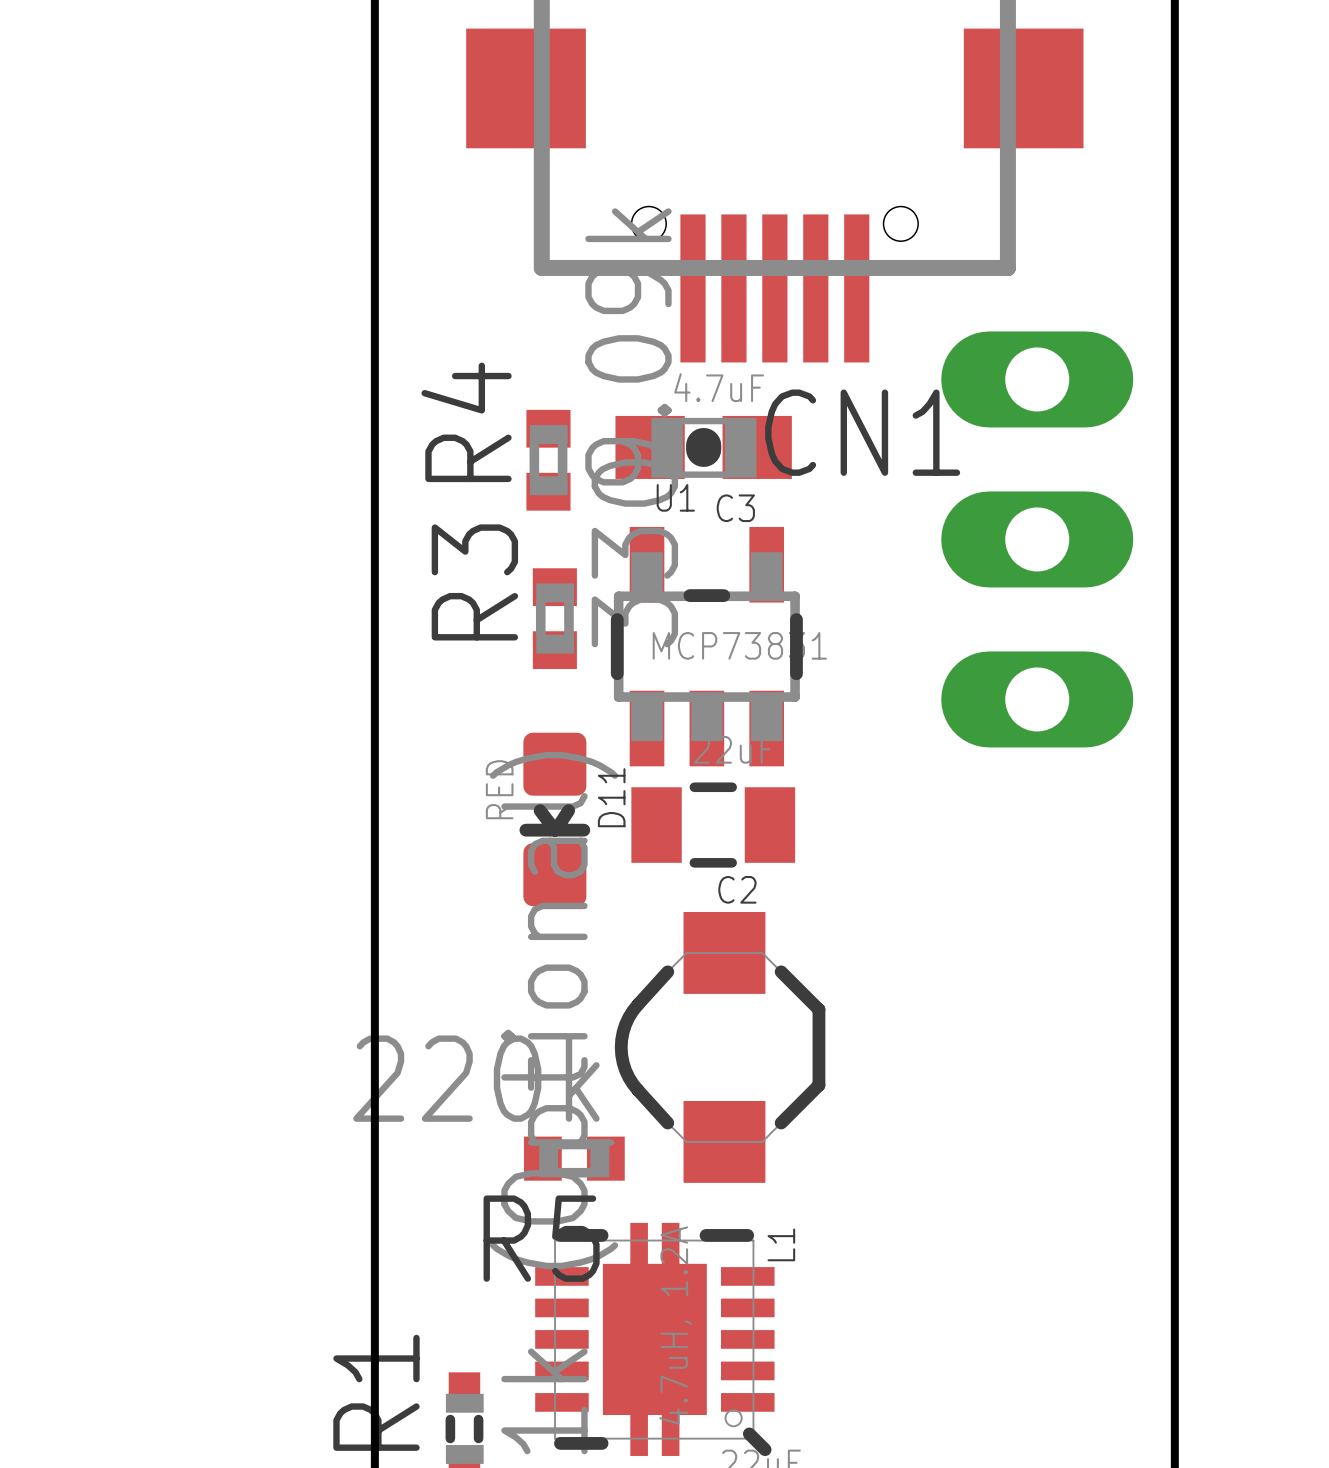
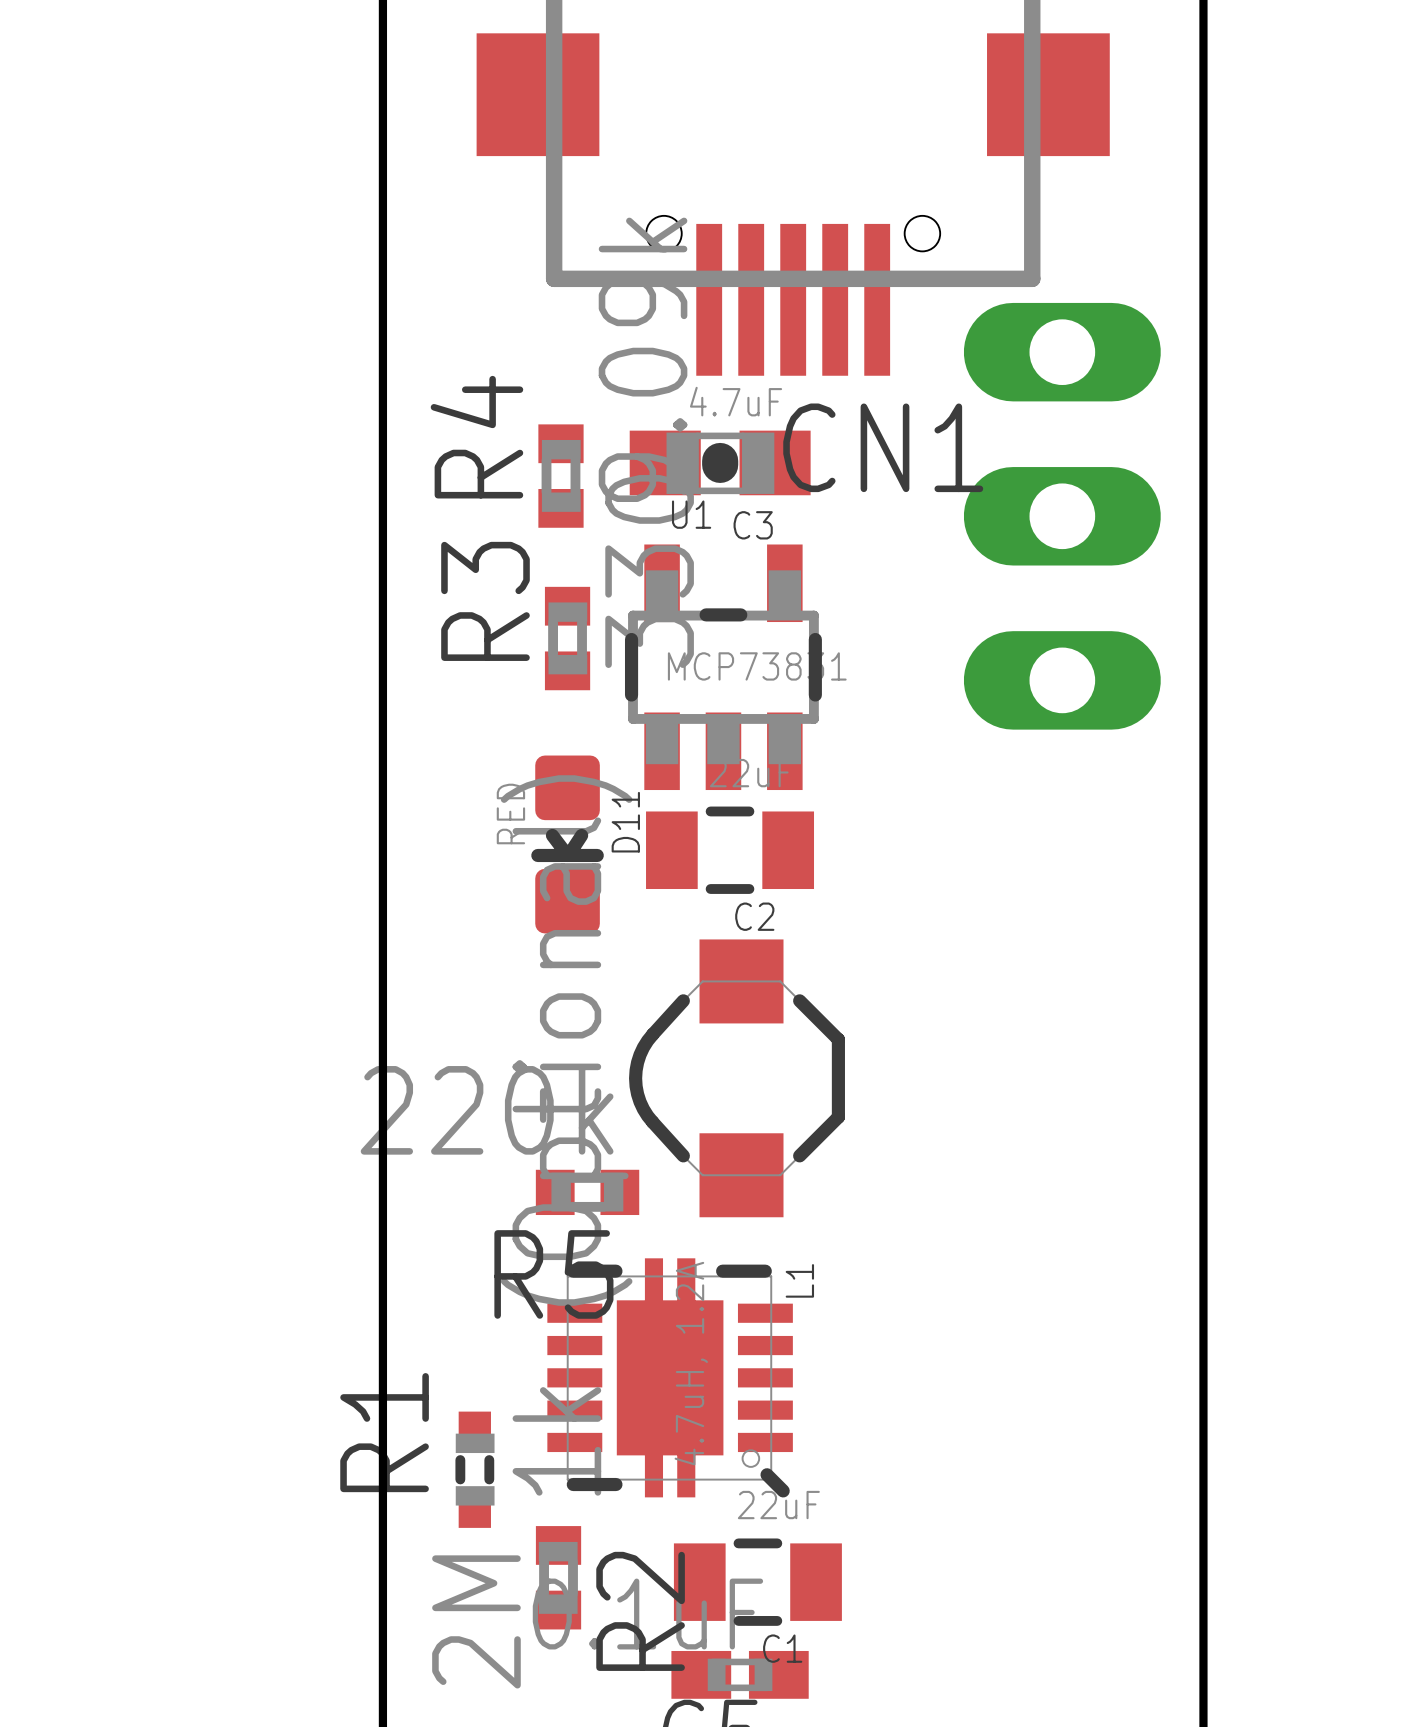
part position: (1037, 539) -> (1062, 516)

